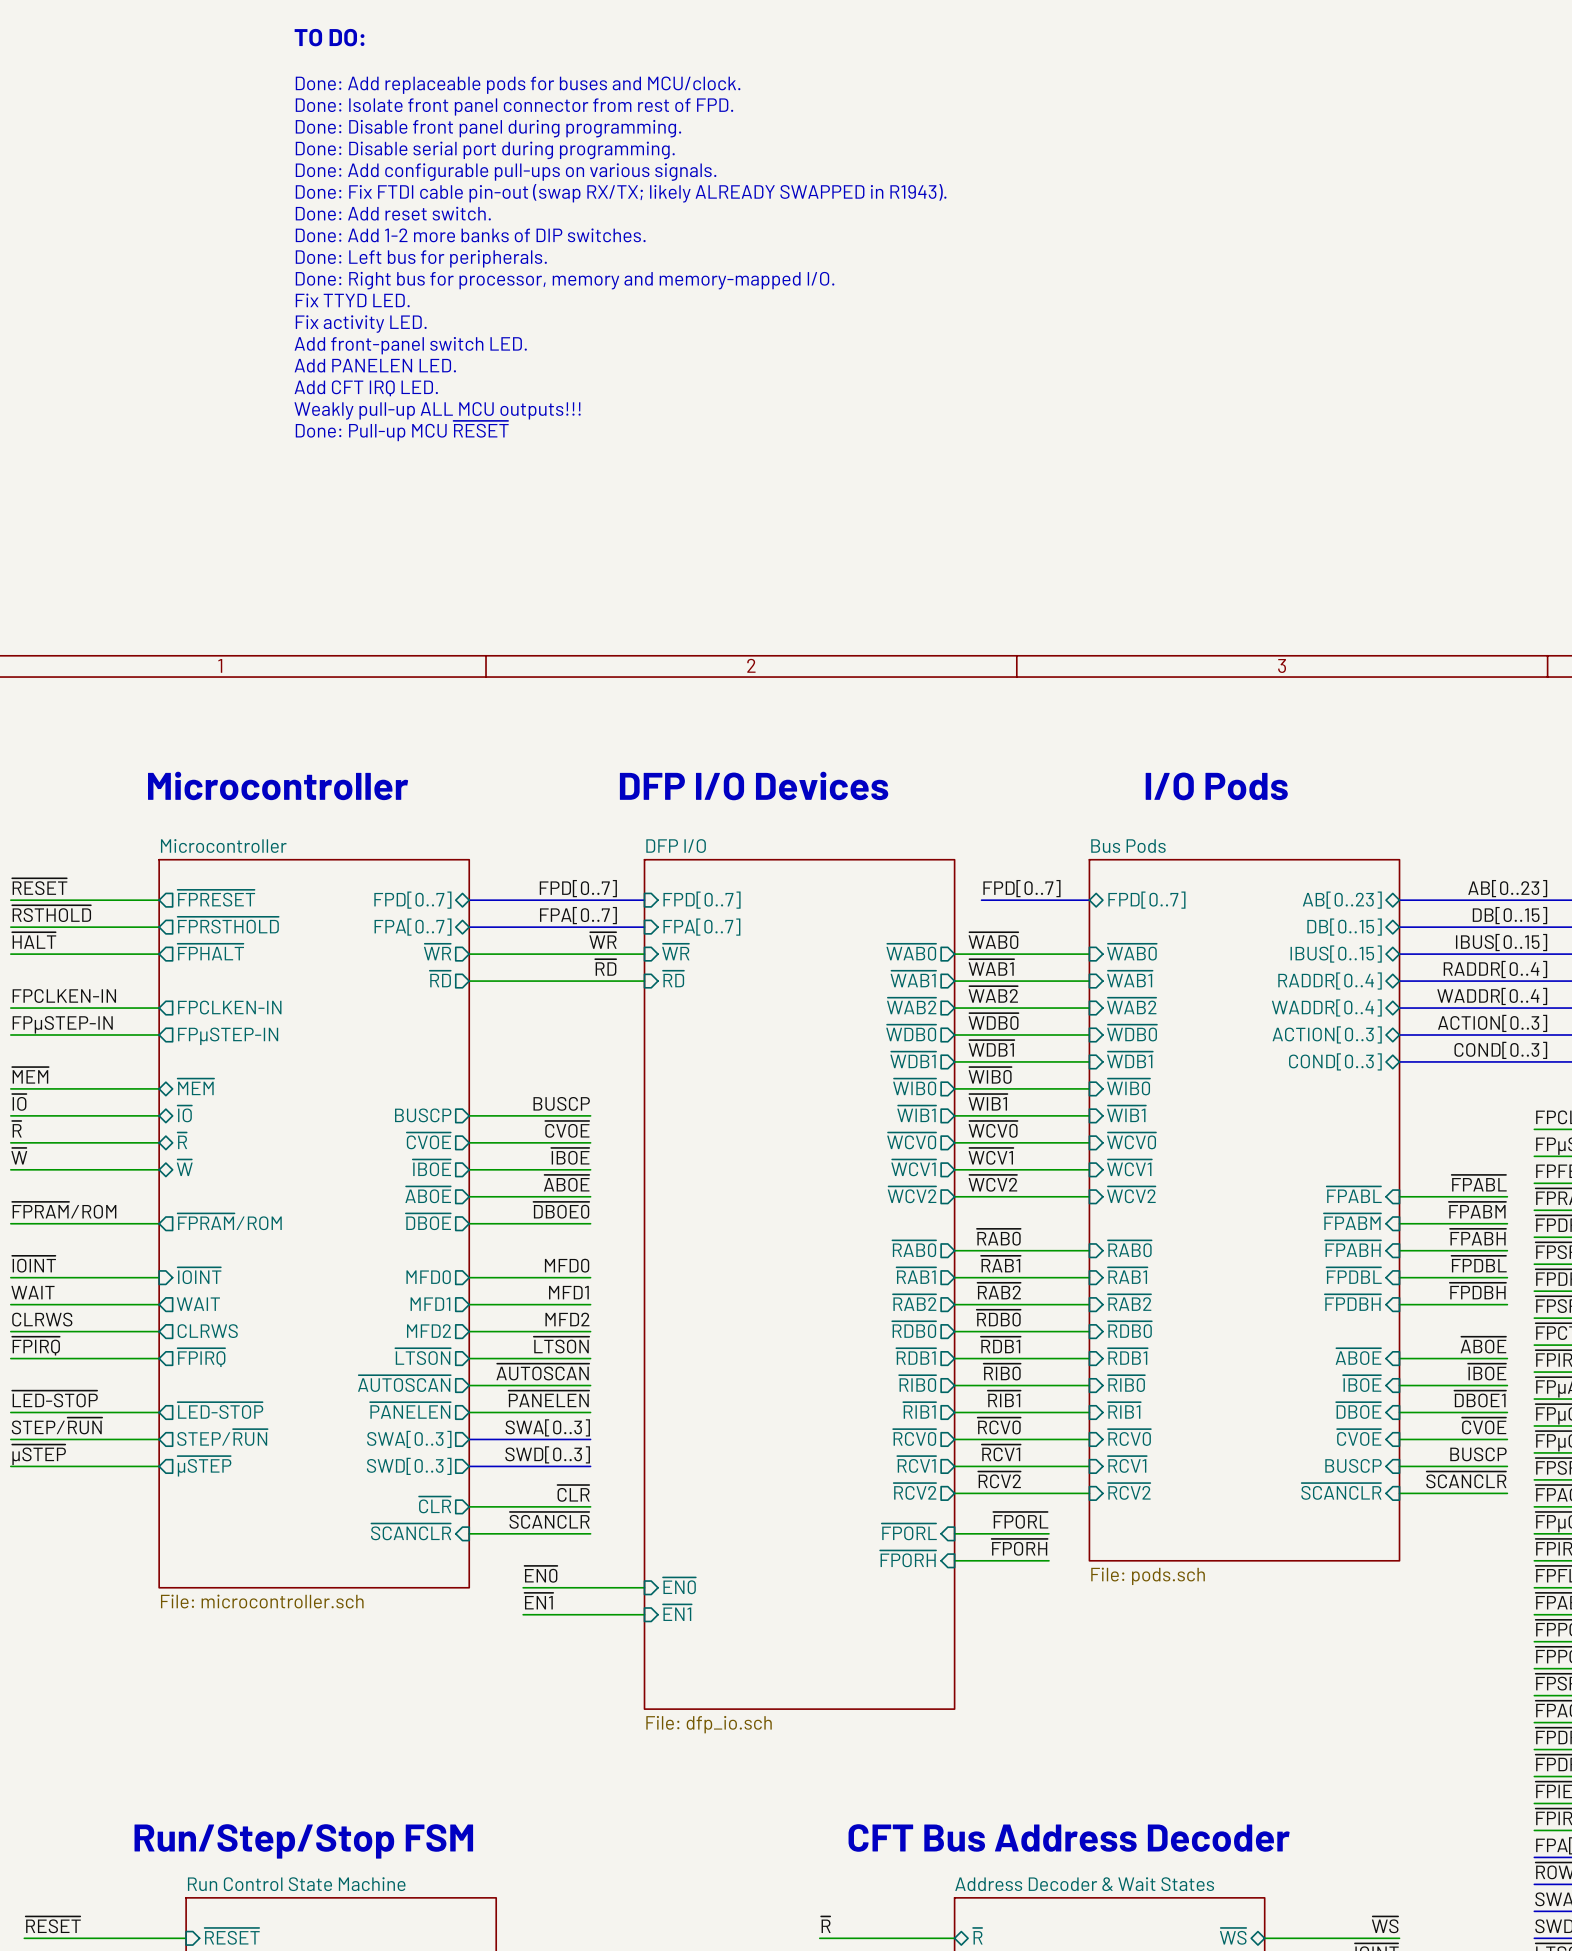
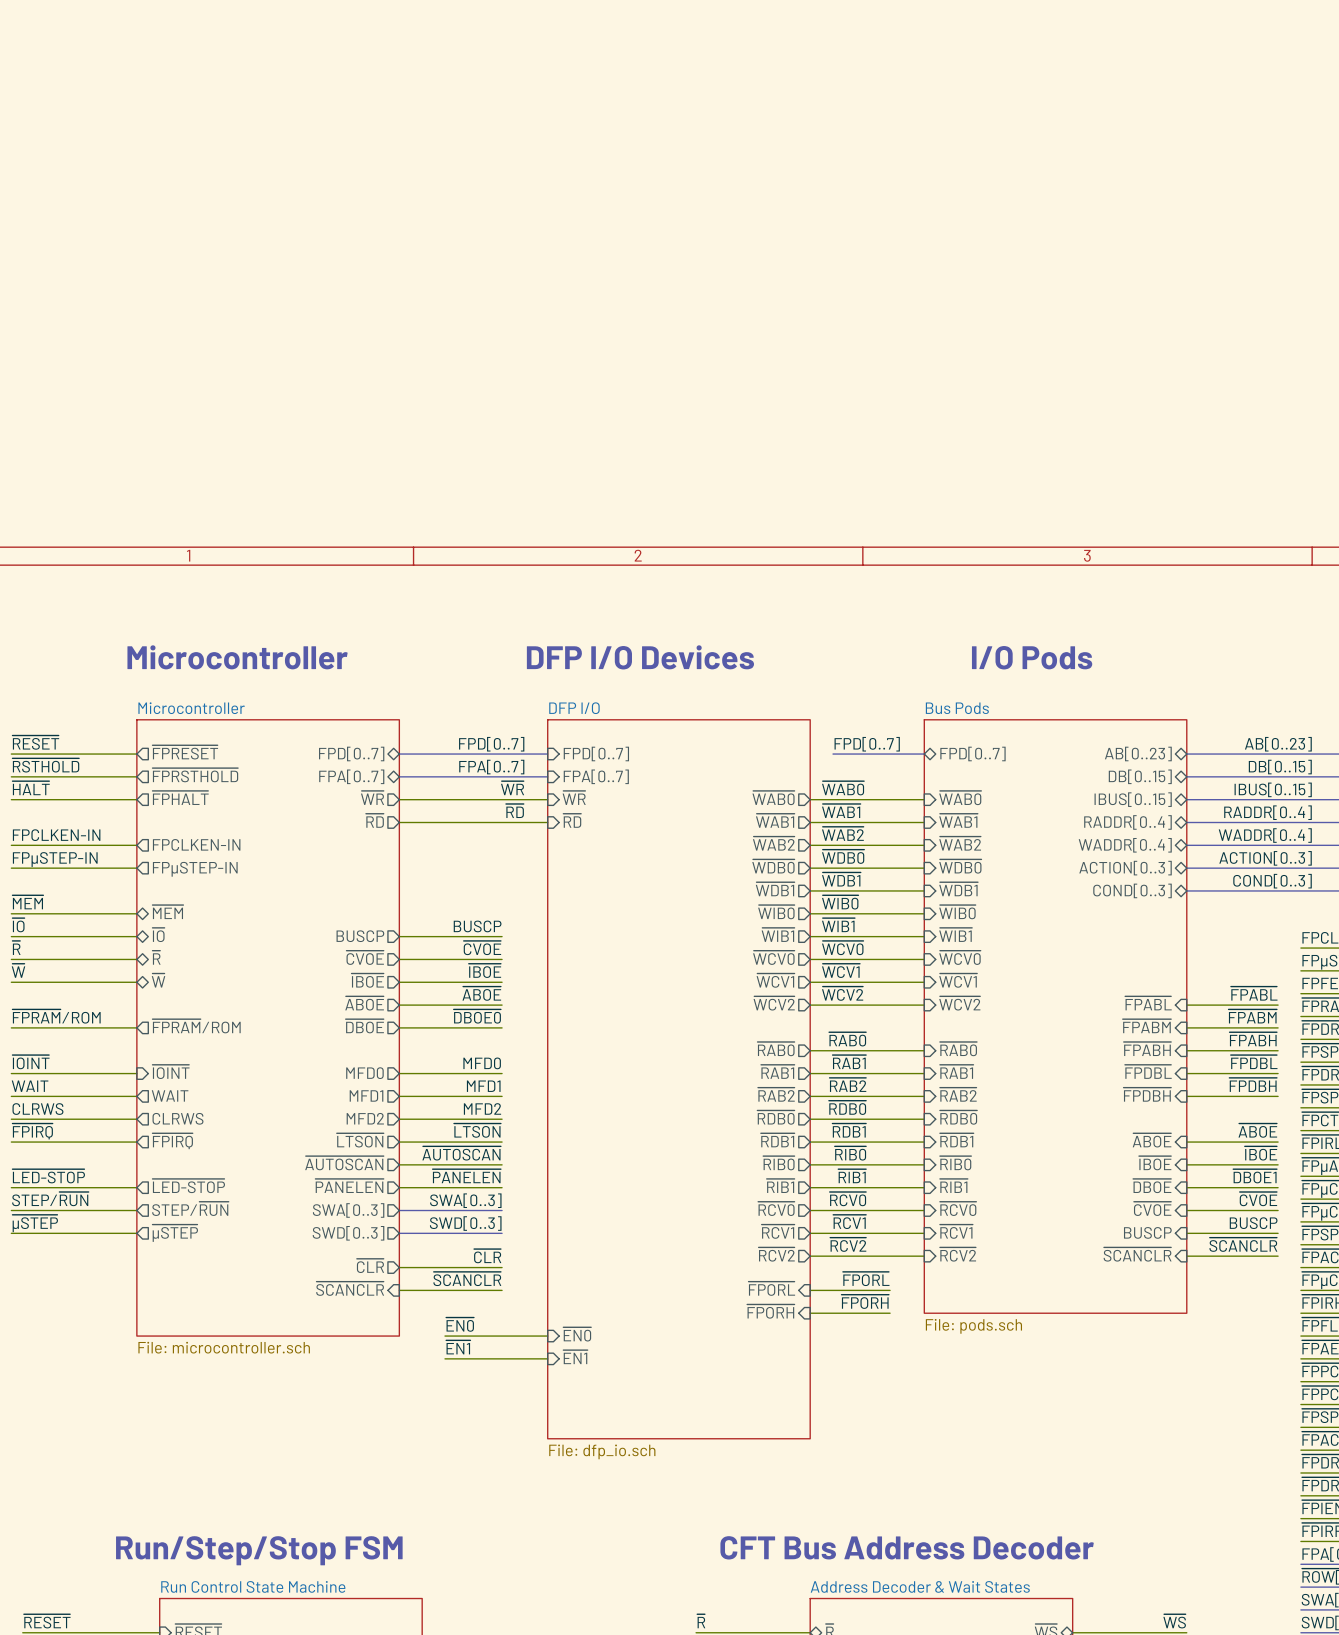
text: TO DO: (329, 37) -> none
text: Done: Add replaceable pods for buses and MCU/clock. (518, 85) -> none
text: Done: Isolate front panel connector from rest of FPD. (514, 106) -> none
text: Done: Disable front panel during programming. (488, 128) -> none
text: Done: Disable serial port during programming. (485, 150) -> none
text: Done: Add configurable pull-ups on various signals. (506, 172) -> none
text: Done: Fix FTDI cable pin-out (swap RX/TX; likely ALREADY SWAPPED in R1943). (621, 193) -> none
text: Done: Add reset switch. (393, 213) -> none
text: Done: Add 1-2 more banks of DIP switches. (470, 235) -> none
text: Done: Left bus for peripherals. (421, 258) -> none
text: Done: Right bus for processor, memory and memory-mapped I/O. (565, 280) -> none
text: Fix TTYD LED. (352, 300) -> none
text: Fix activity LED. (361, 324) -> none
text: Add front-panel switch LED. (410, 345) -> none
text: Add PANELEN LED. (375, 365) -> none
text: Add CFT IRQ LED. (366, 388) -> none
text: Weakly pull-up ALL MCU outputs!!! (437, 410) -> none
text: Done: Pull-up MCU ~{RESET} (402, 431) -> none

